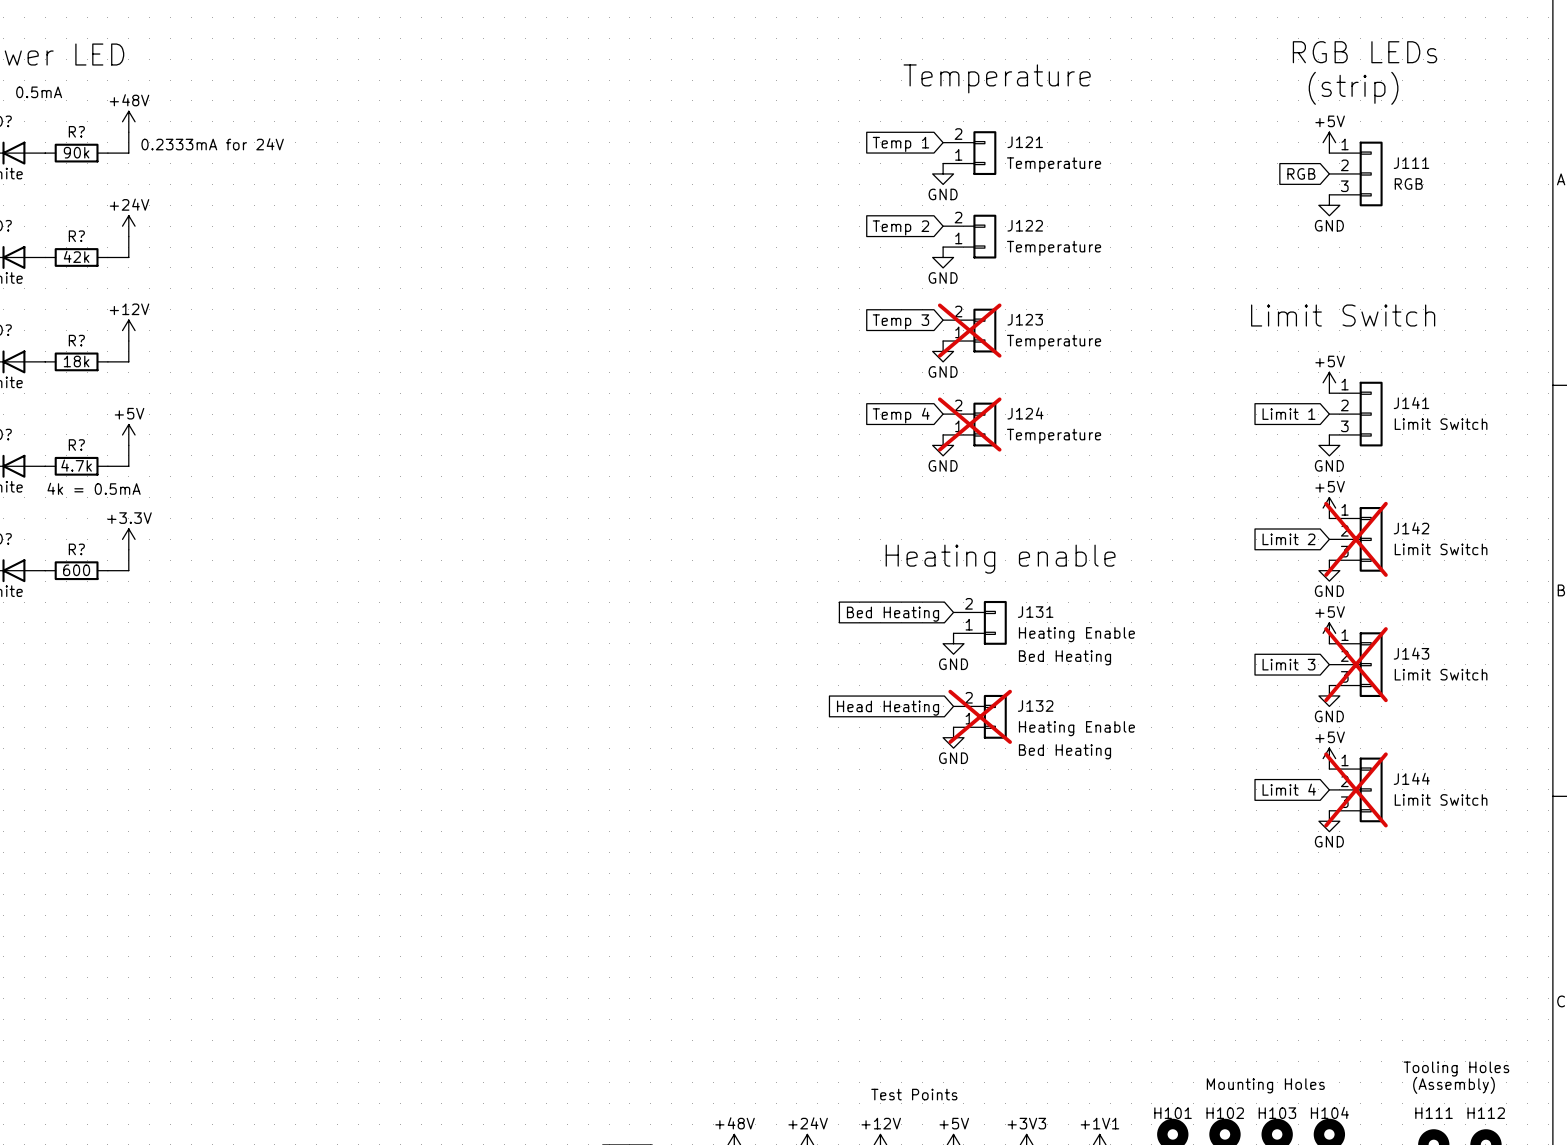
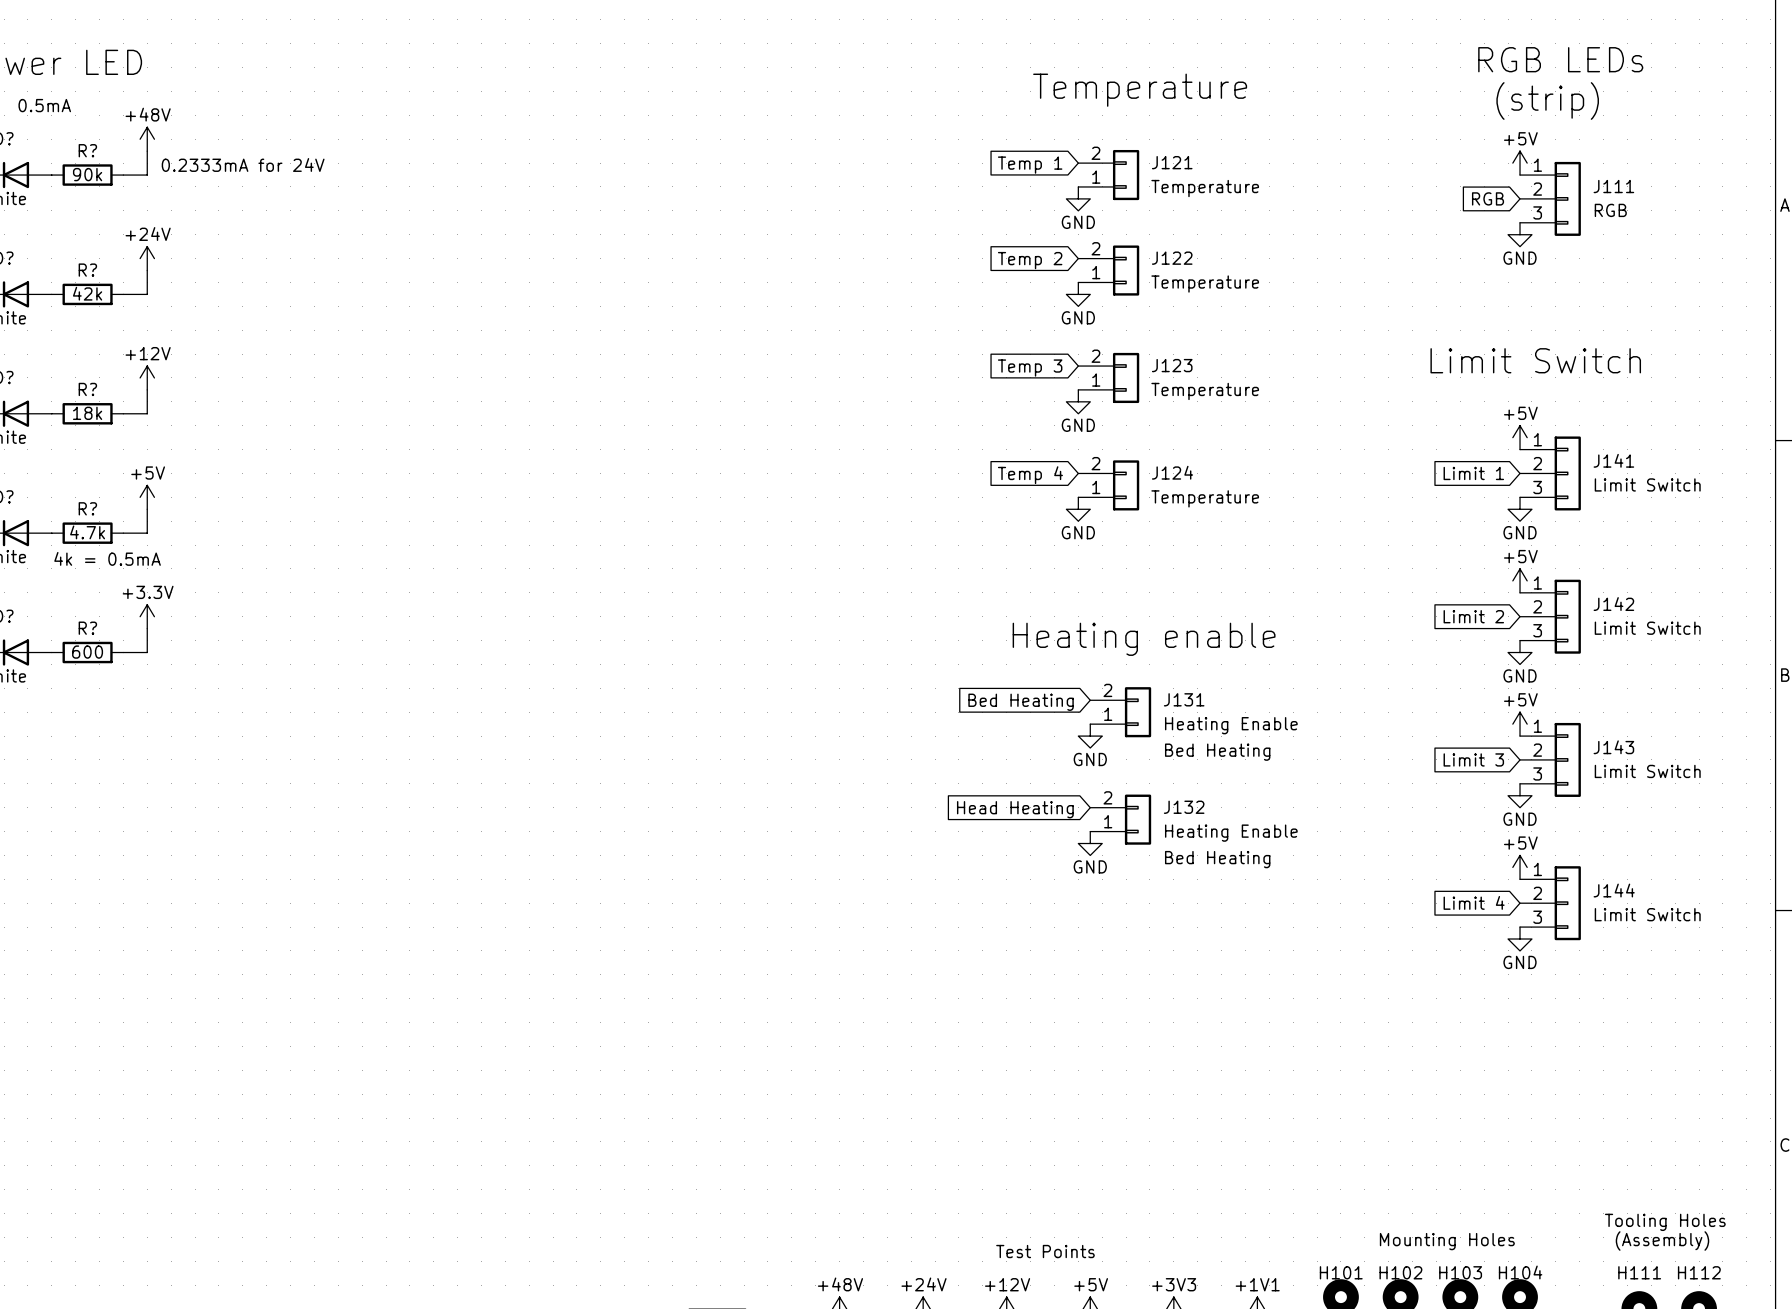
J123 do-not-place cross: (969, 330) -> none
J124 do-not-place cross: (969, 424) -> none
J142 do-not-place cross: (1356, 539) -> none
J143 do-not-place cross: (1356, 664) -> none
J132 do-not-place cross: (980, 716) -> none
J144 do-not-place cross: (1356, 789) -> none

